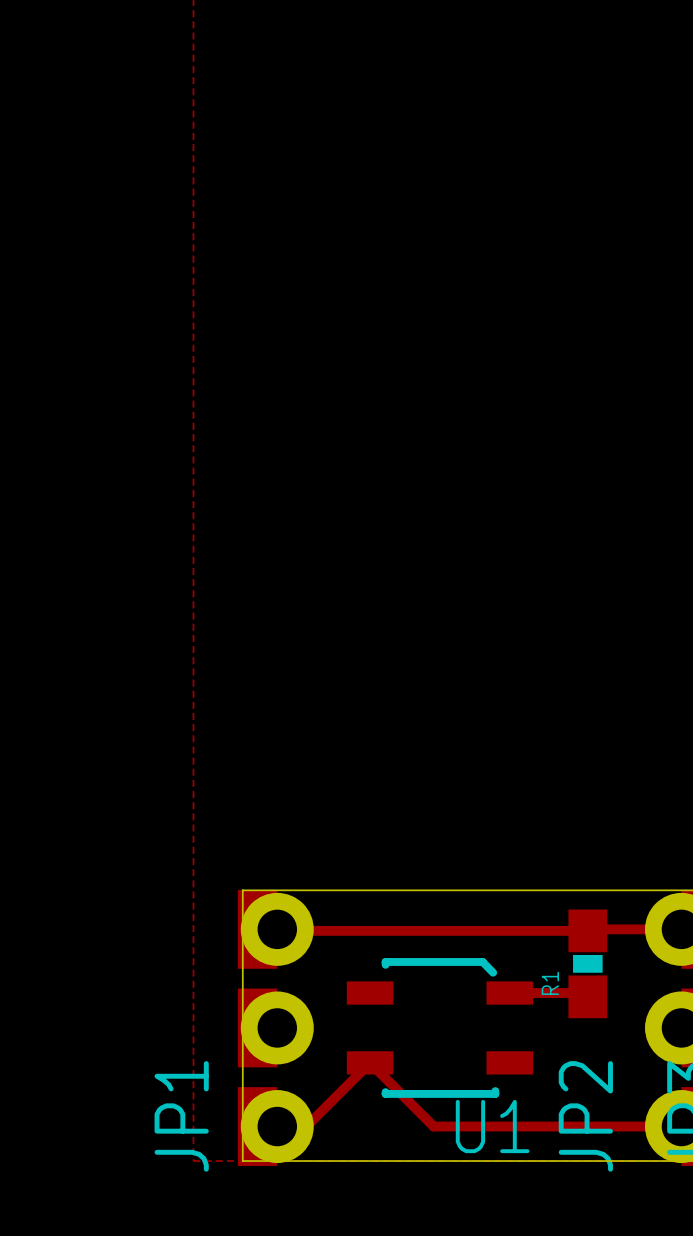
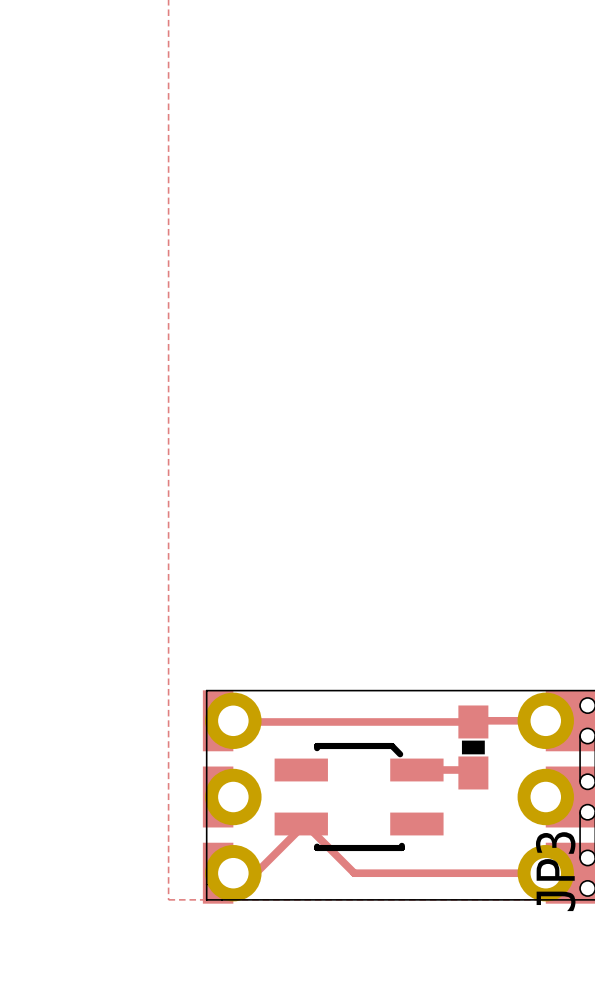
R1 name: R1 (550, 983) -> none
U1: (439, 1027) -> none
part: none -> (359, 797)
JP1 name: JP1 (181, 1116) -> none
JP2 name: JP2 (585, 1116) -> none

